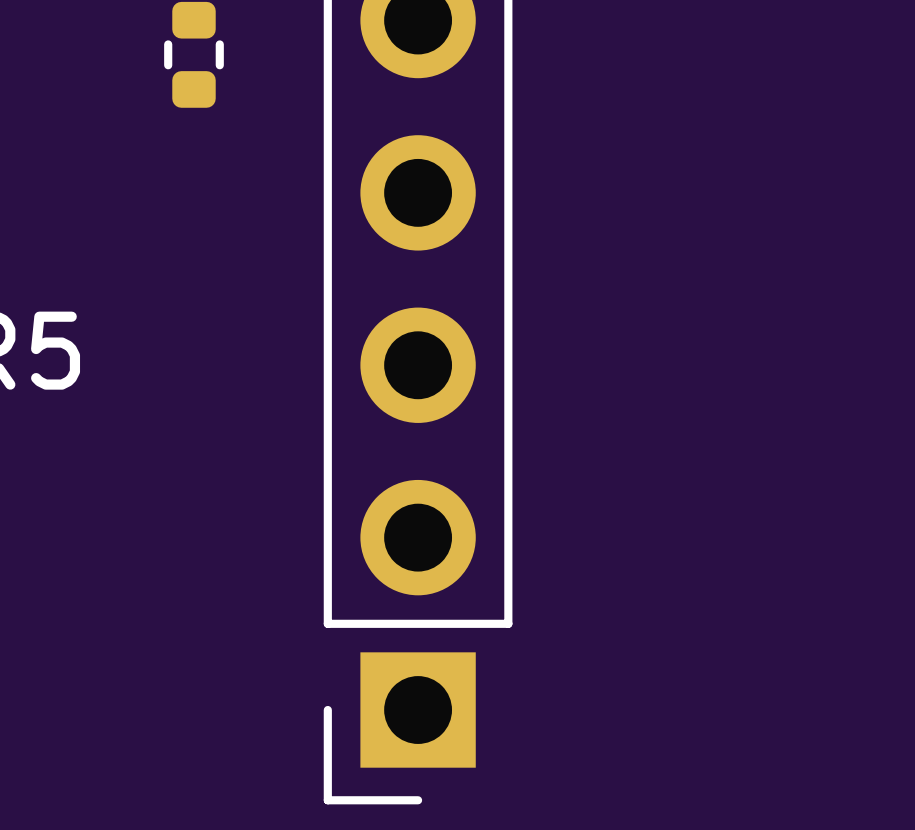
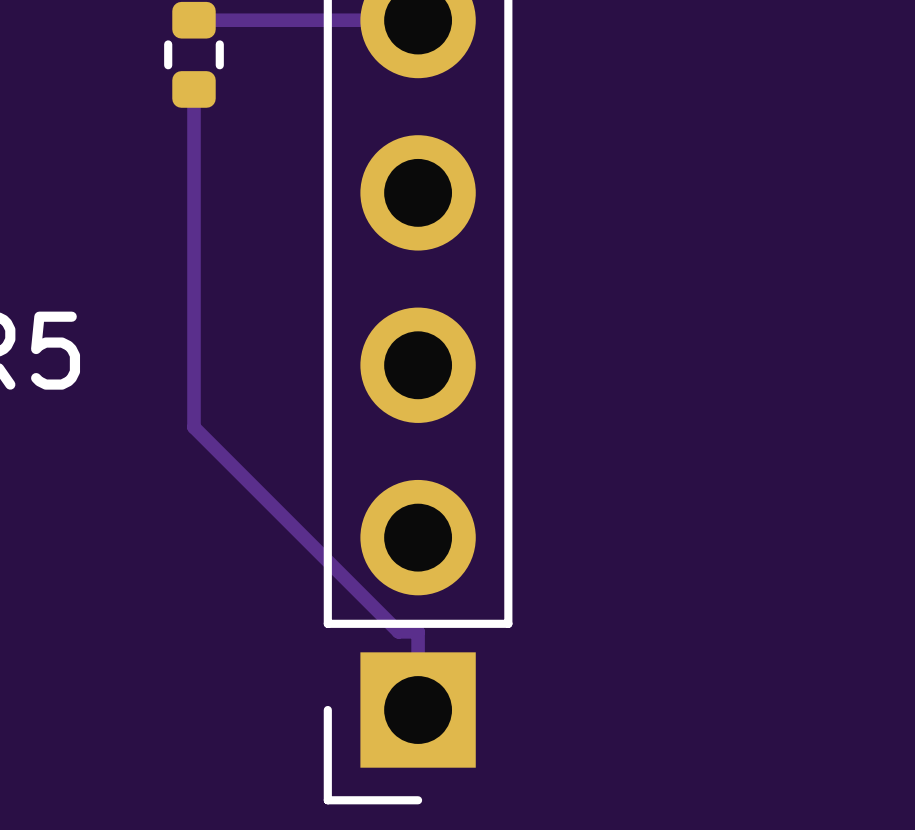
track: none -> (193, 20) (417, 20)
track: none -> (193, 89) (193, 427) (398, 631) (418, 631) (418, 710)

